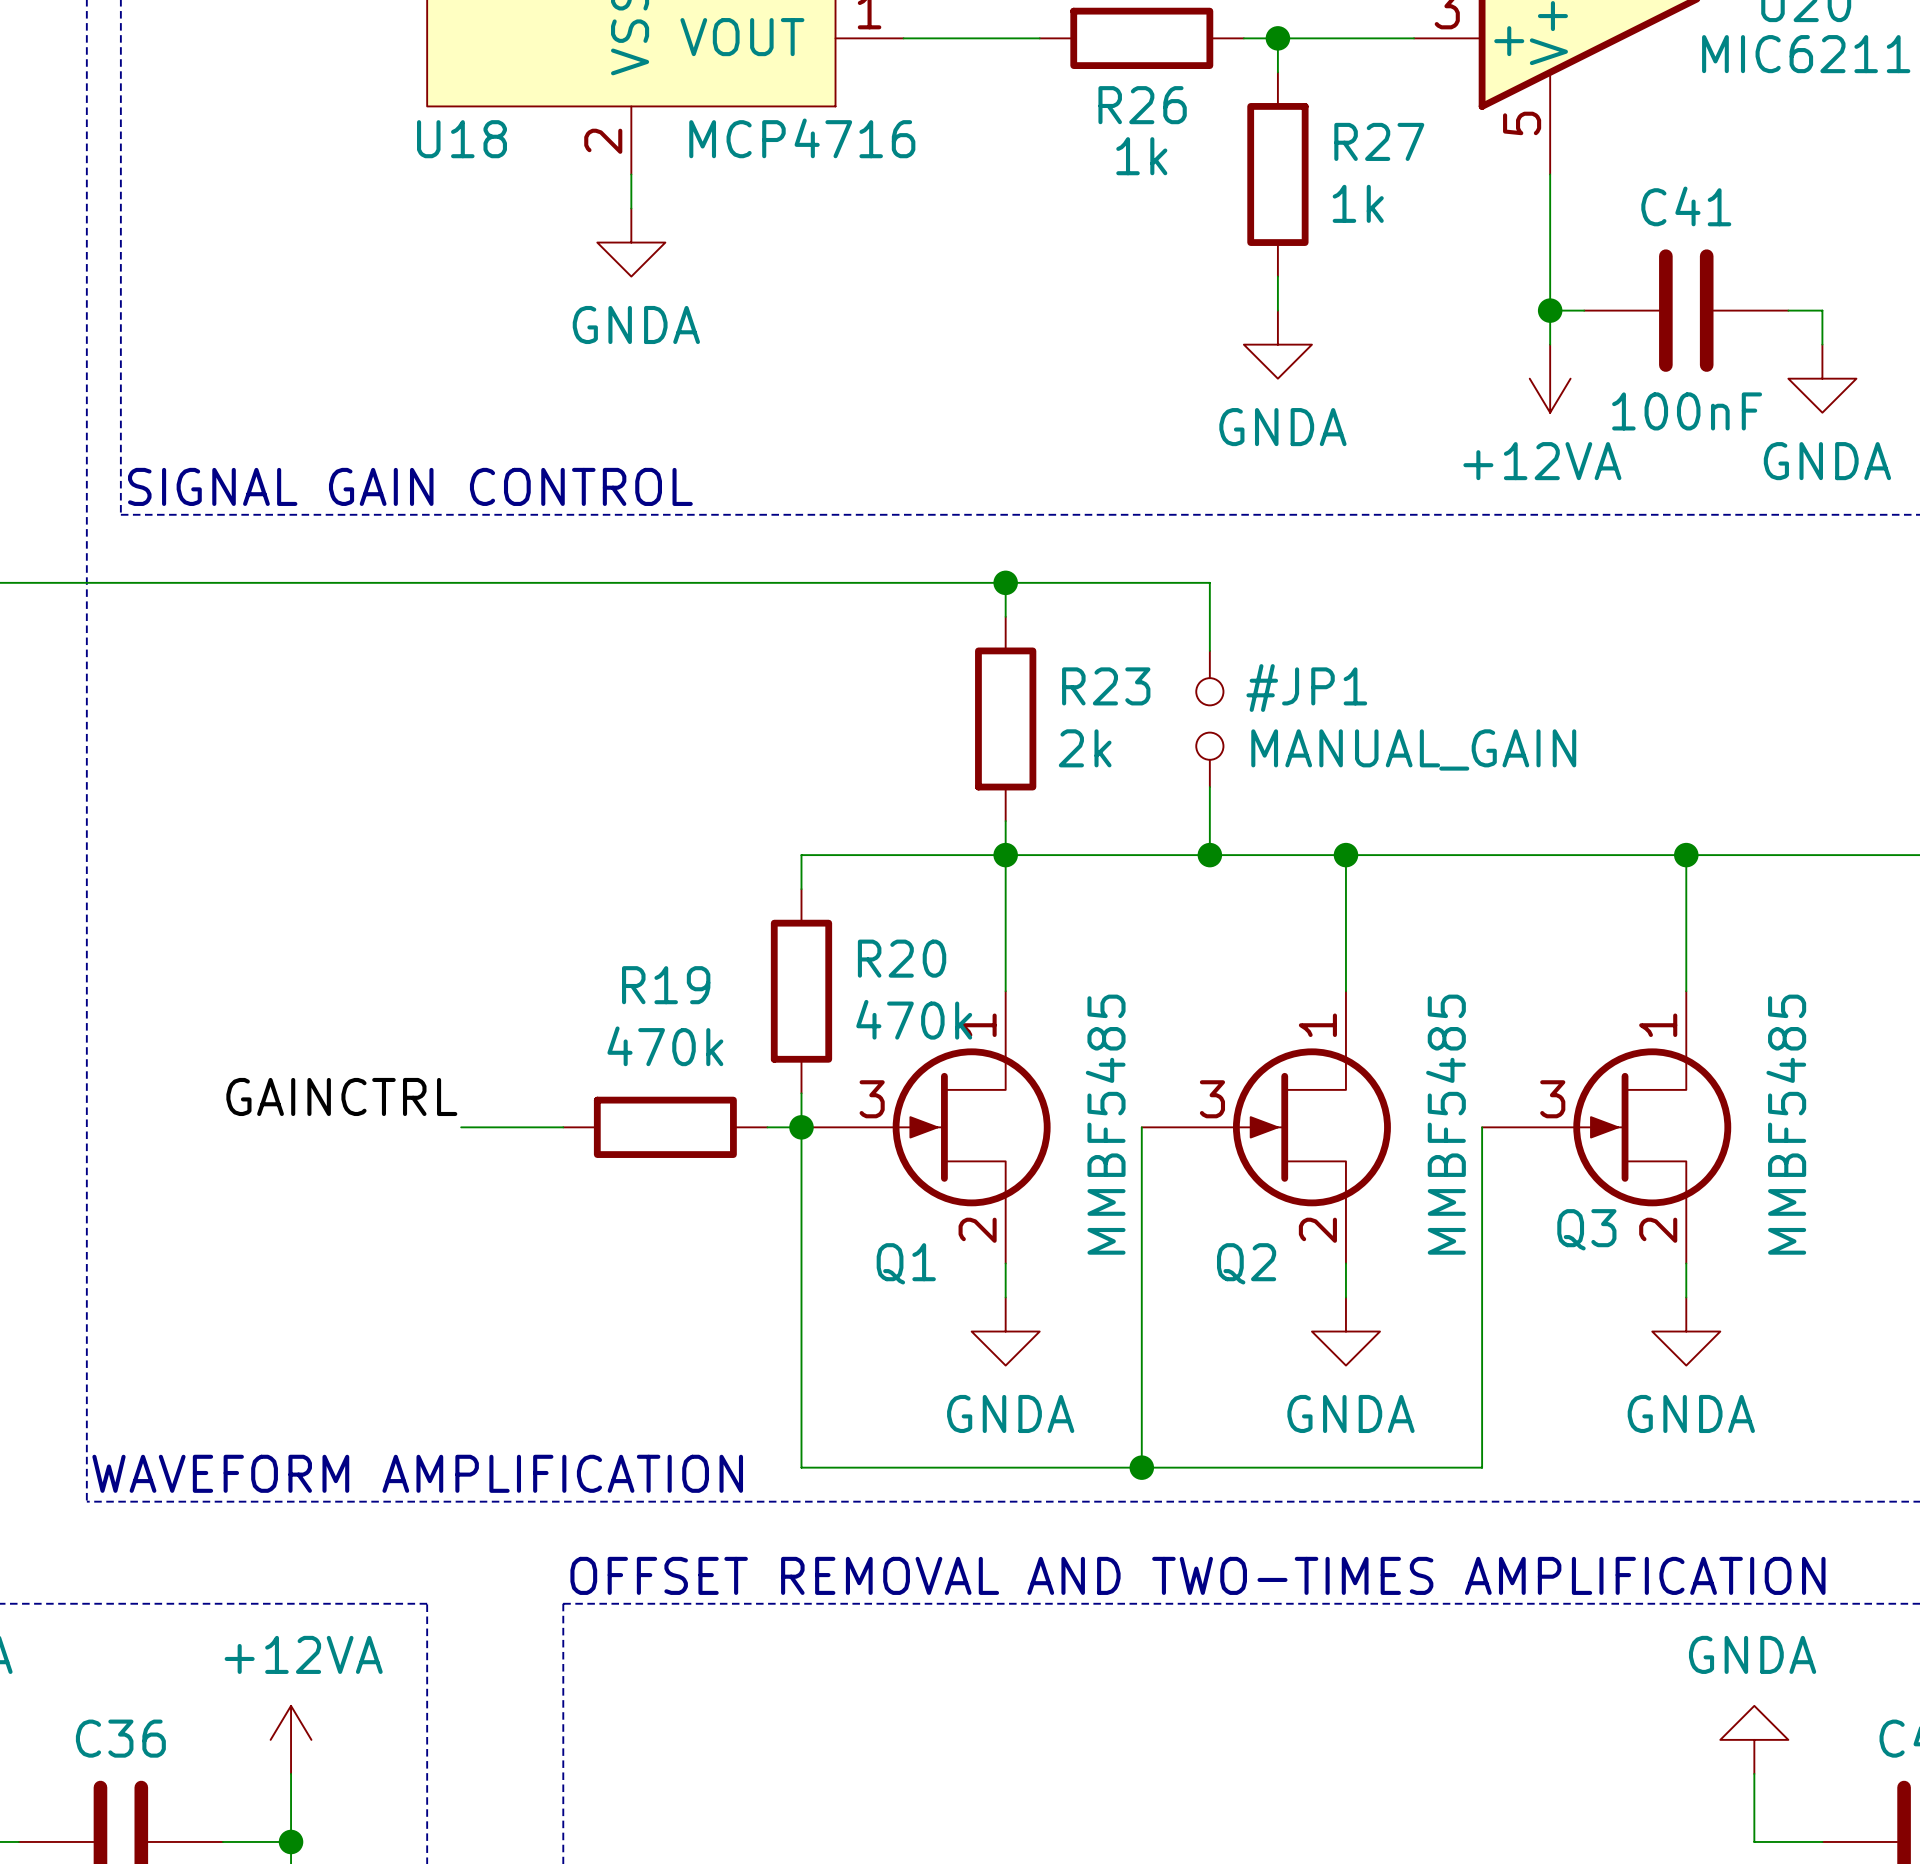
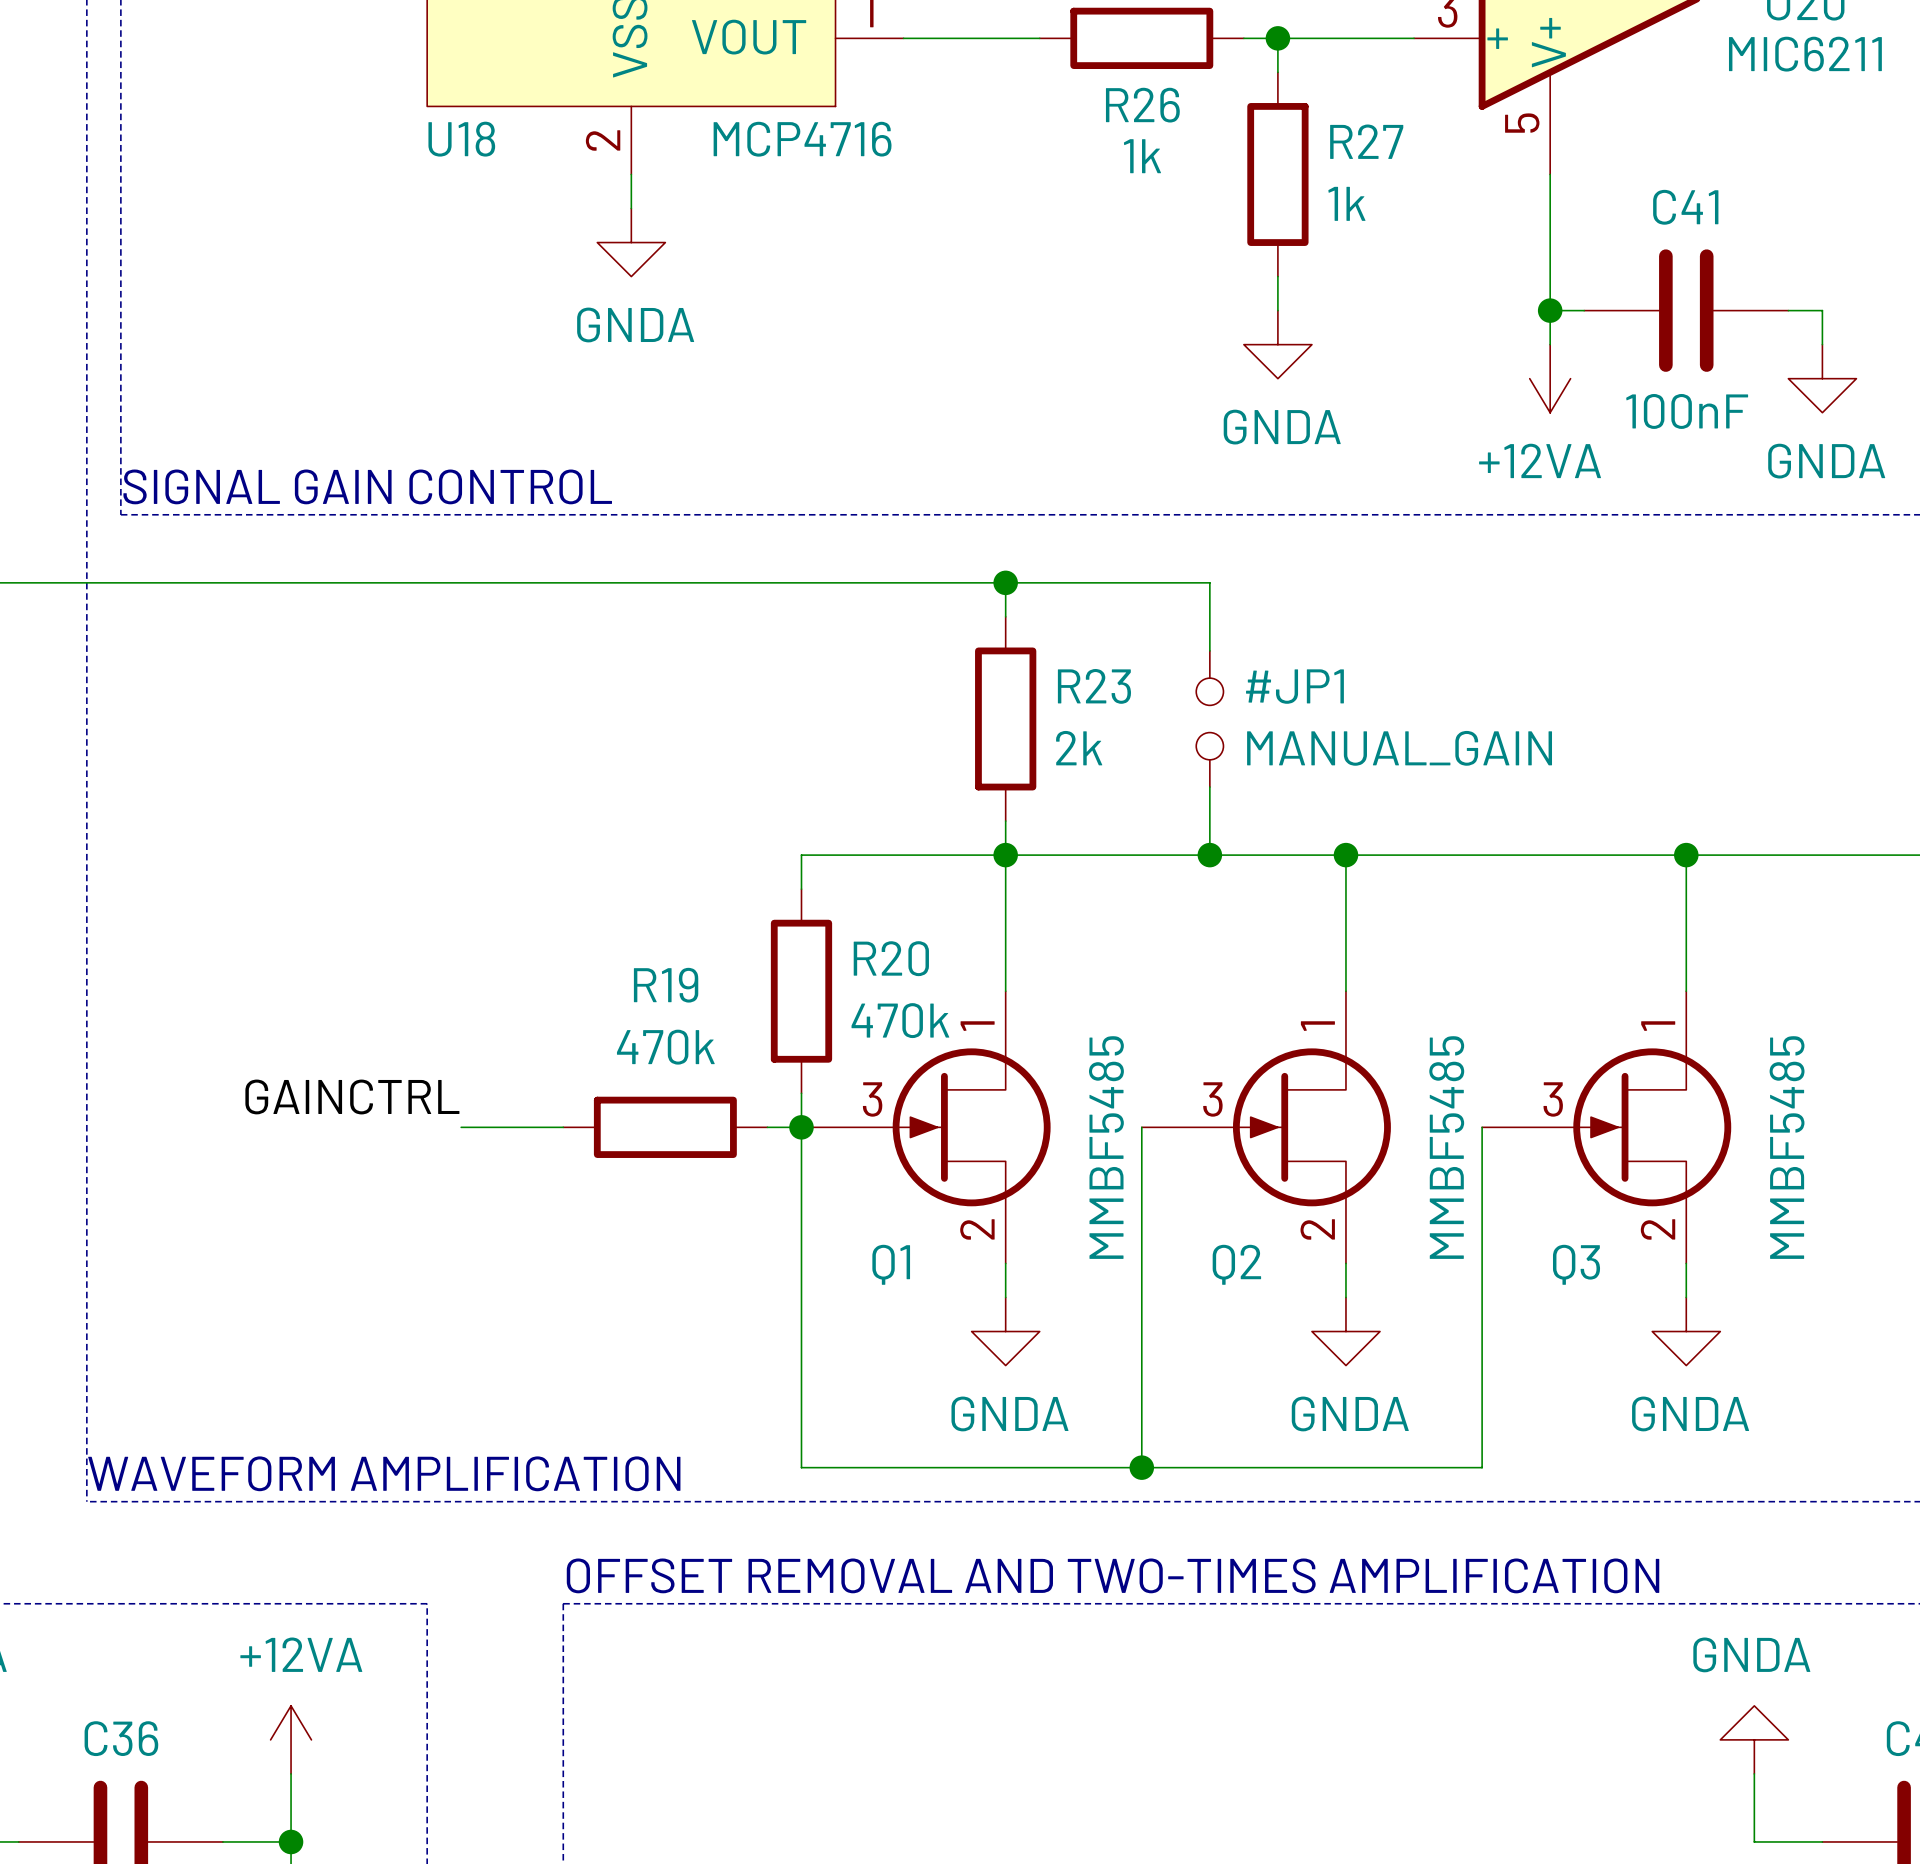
Q3 name position: Q3 (1586, 1229) -> Q3 (1576, 1264)

